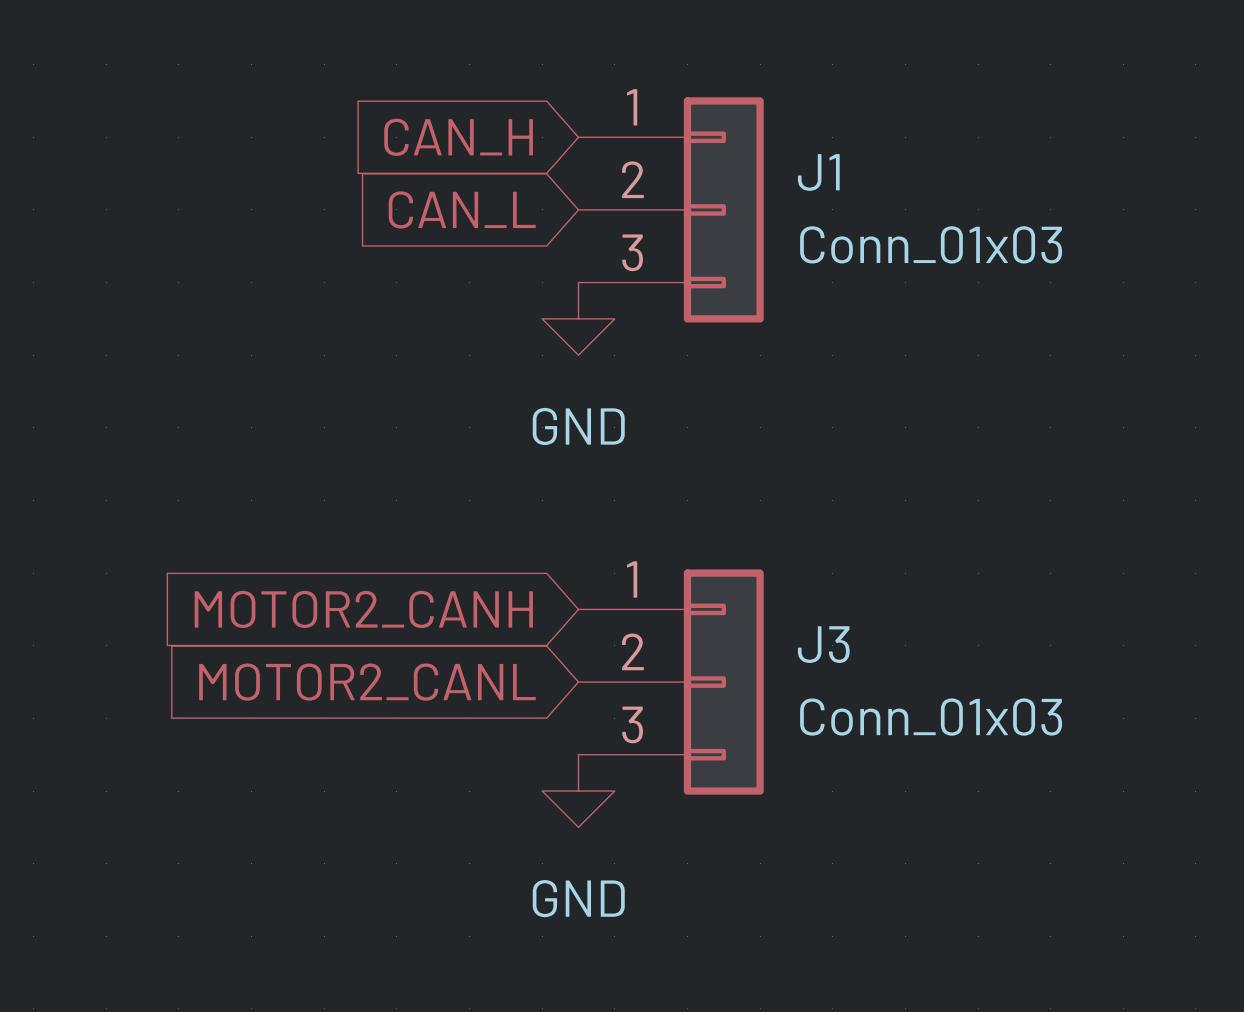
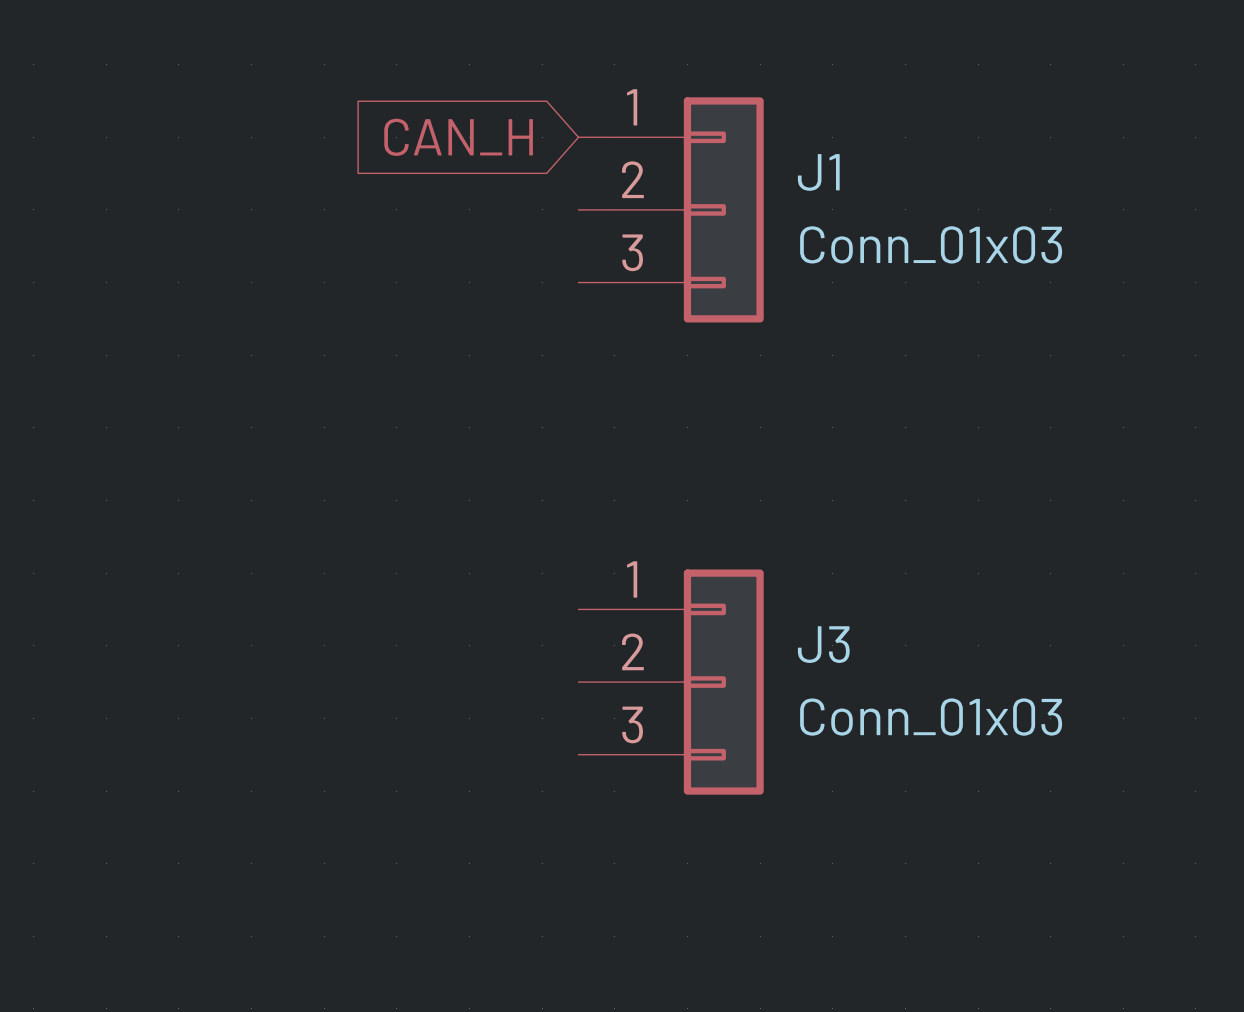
global label: CAN_L (462, 209) -> none
power symbol: GND (578, 318) -> none
global label: MOTOR2_CANH (363, 609) -> none
global label: MOTOR2_CANL (367, 682) -> none
power symbol: GND (578, 791) -> none

